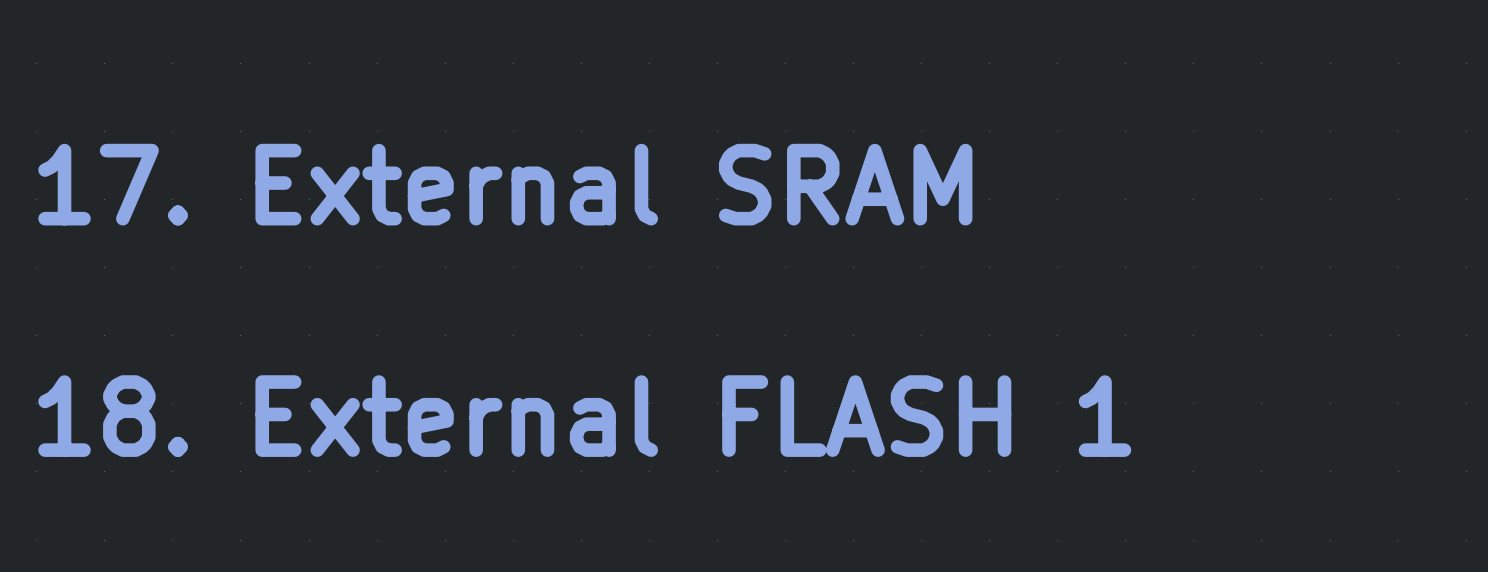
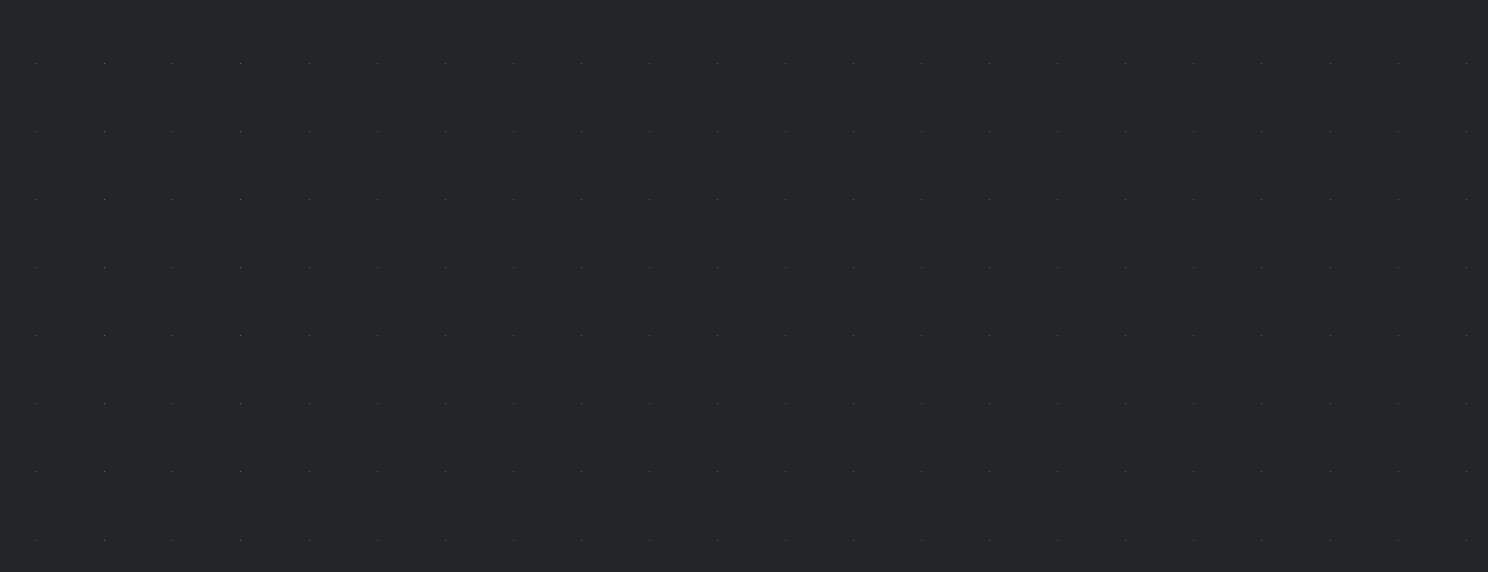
text: 17. External SRAM (505, 184) -> none
text: 18. External FLASH 1 (584, 416) -> none

